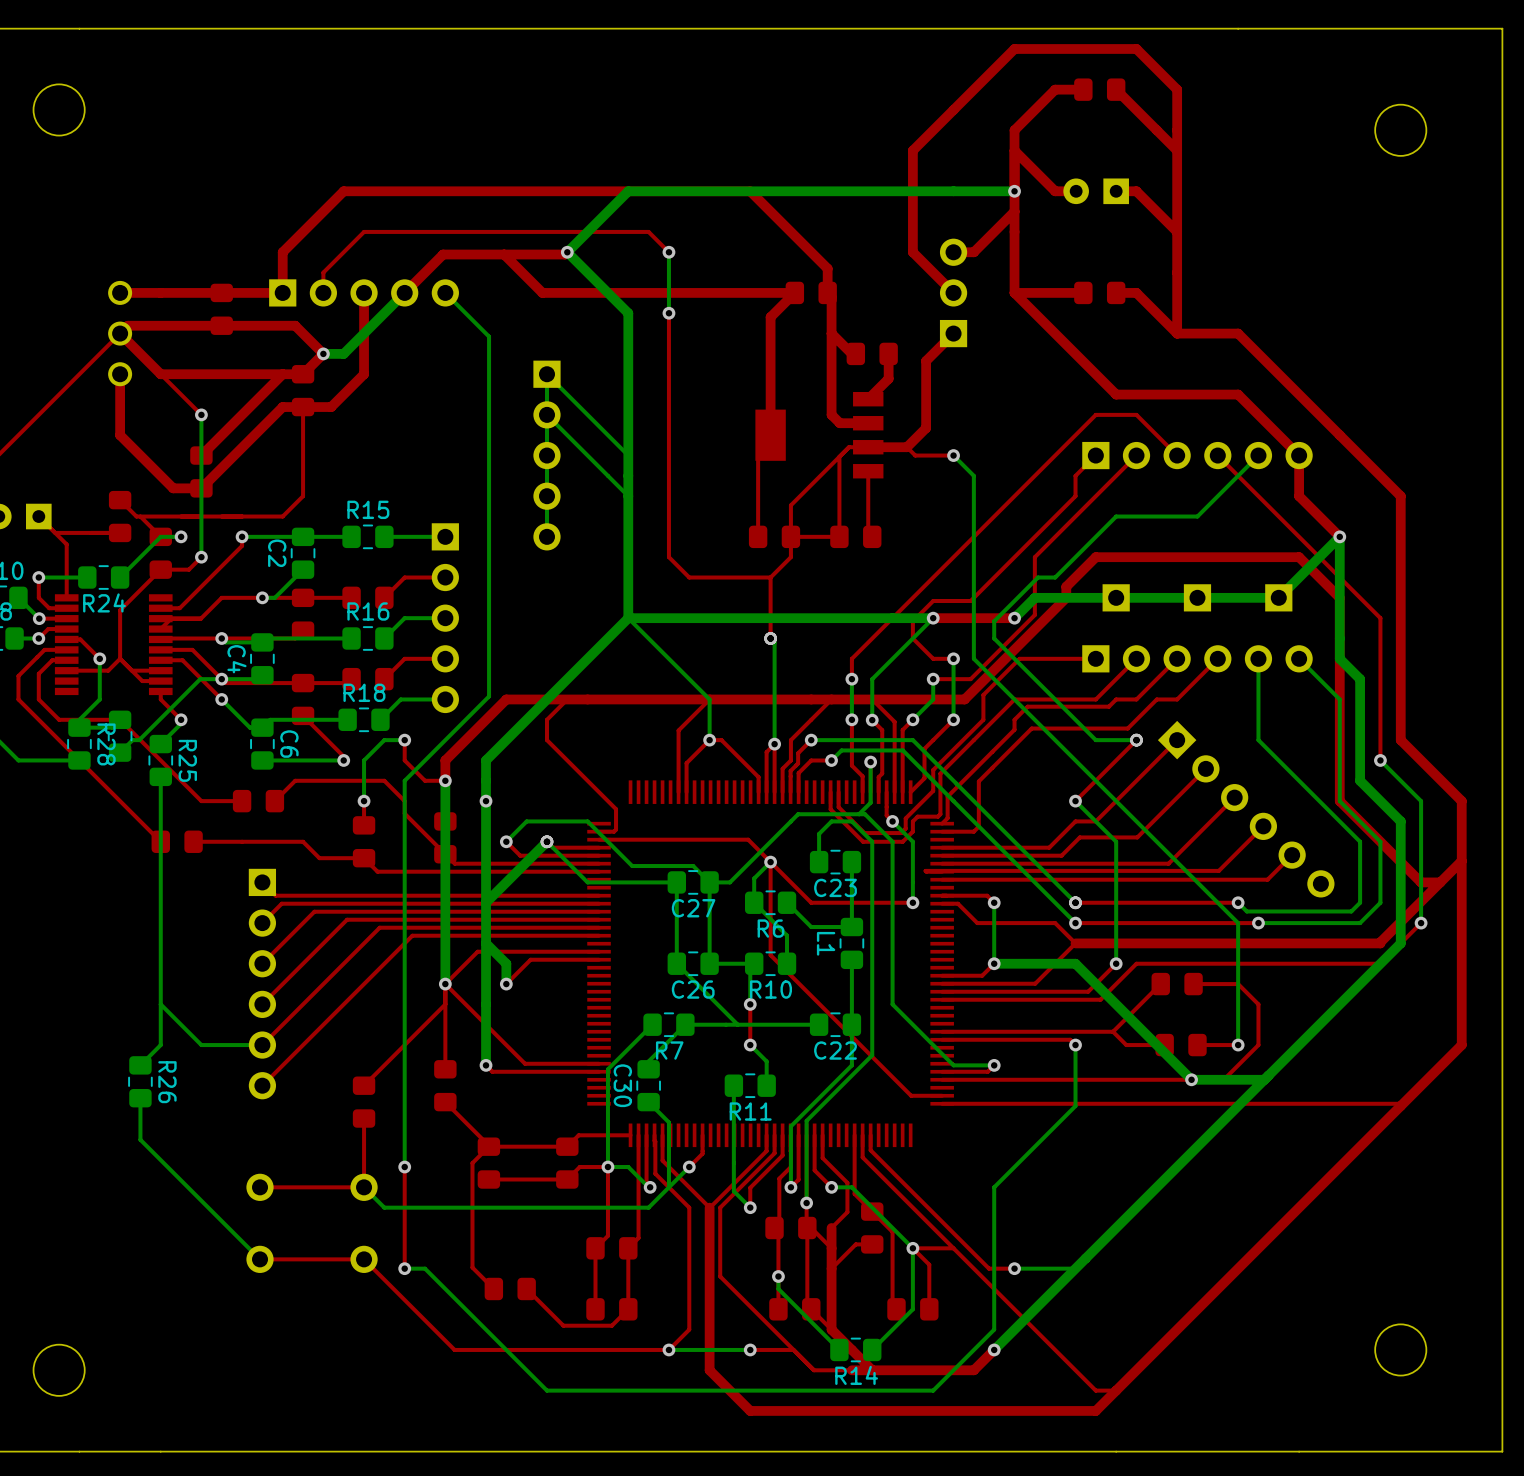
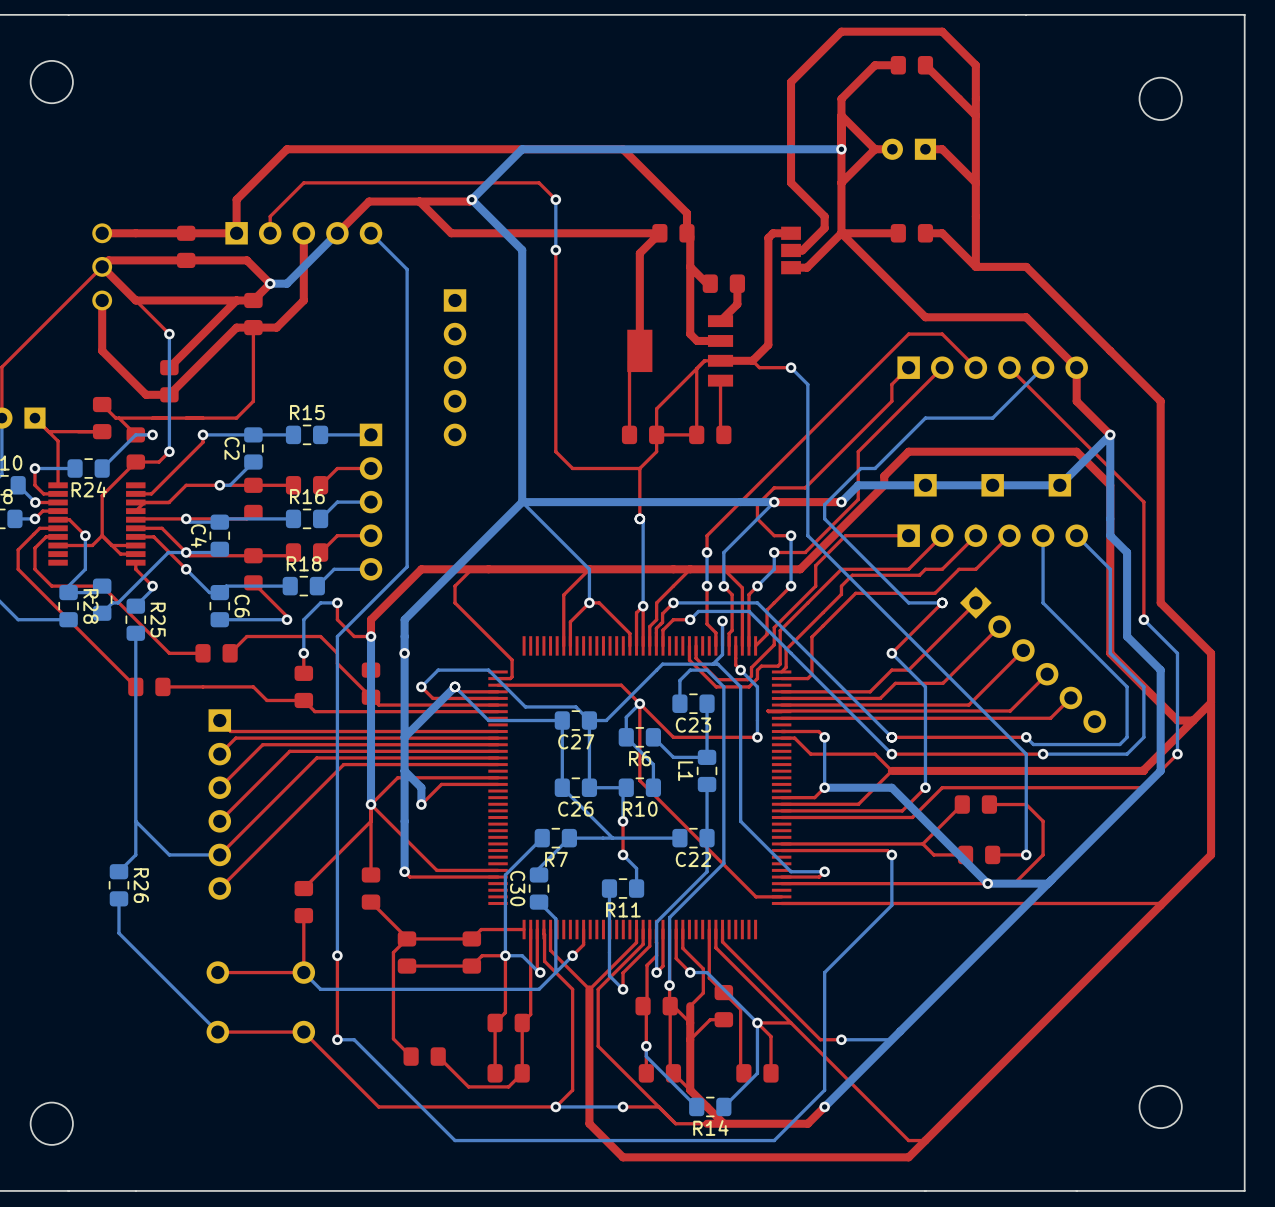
top track: (953, 109) (912, 150) (912, 252) (953, 292) -> (791, 82) (791, 182) (824, 216) (824, 228) (802, 250) (791, 250)
top track: none -> (875, 149) (841, 182)
top track: (1014, 211) (973, 252) (953, 252) -> none
part: (953, 292) -> none
top track: none -> (841, 233) (807, 267) (791, 267)
part: none -> (791, 250)
top track: (953, 333) (926, 361) -> (791, 233) (773, 233) (768, 237) (768, 289)
bottom track: (546, 414) (628, 496) -> none
bottom track: (628, 475) (628, 455) (546, 374) (546, 536) -> none

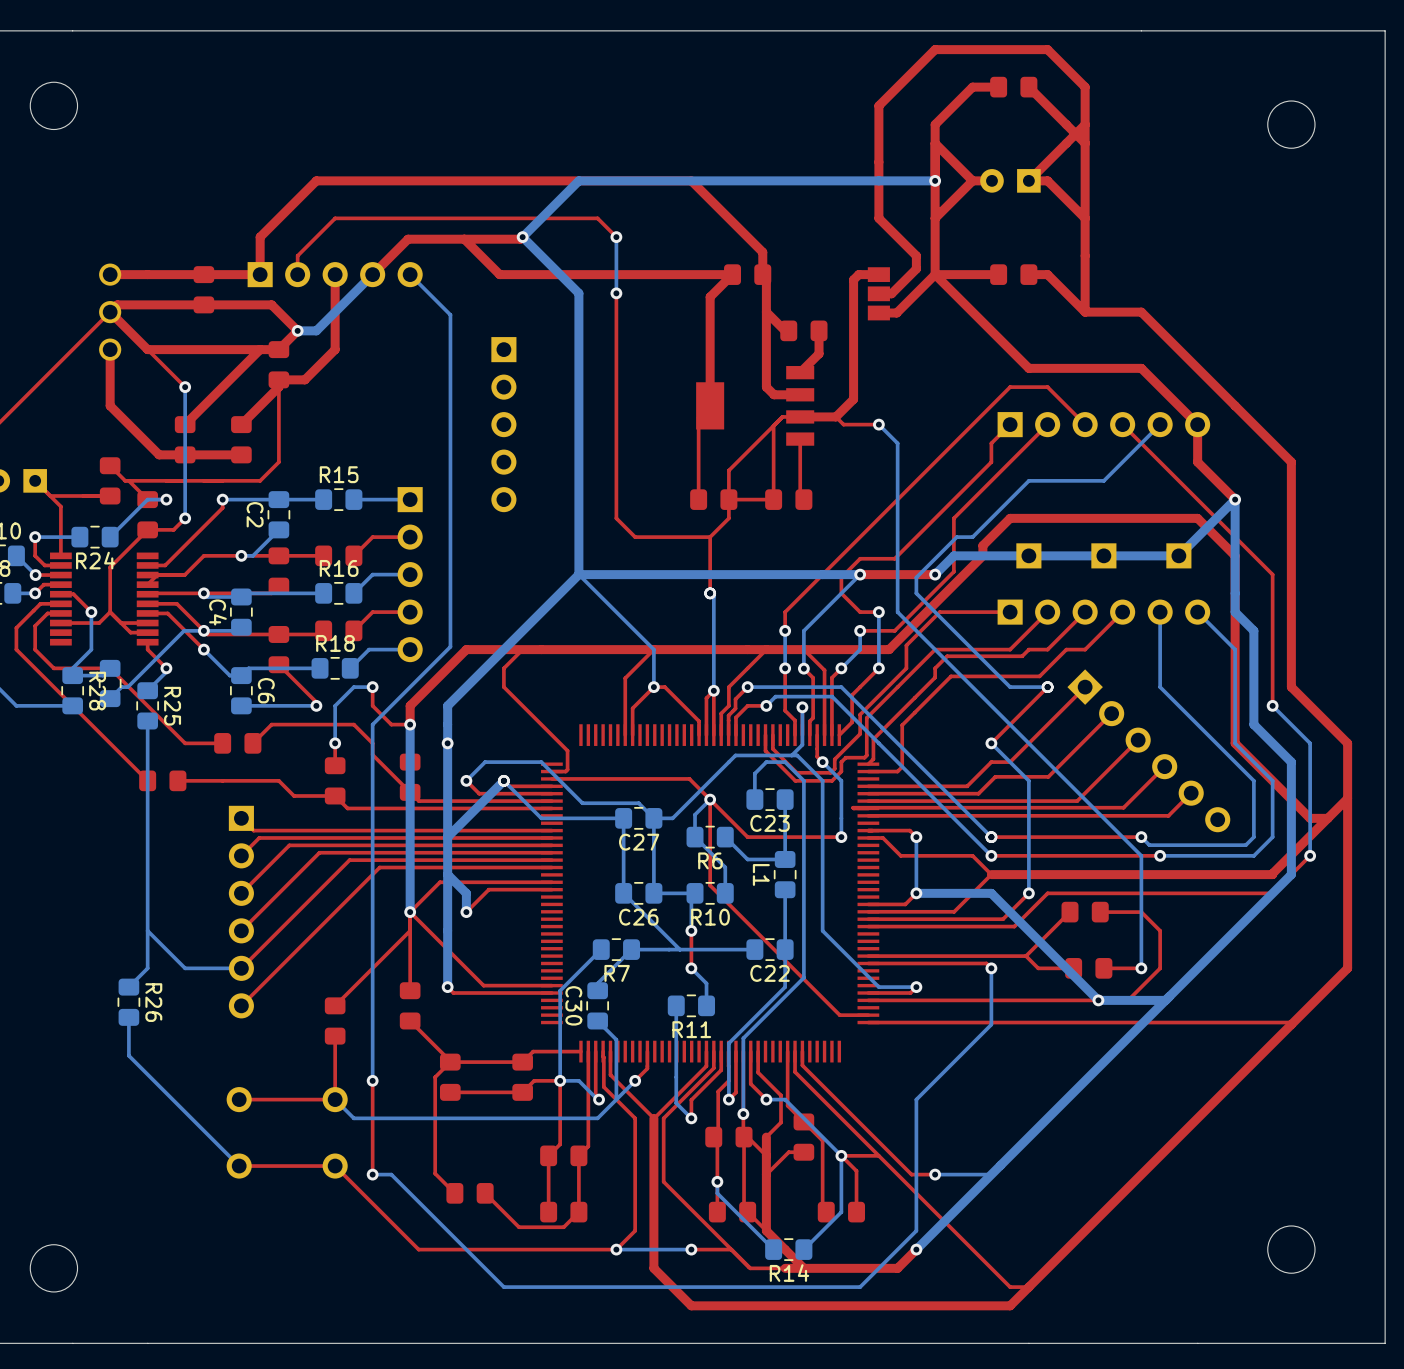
top track: none -> (1085, 124) (1028, 180)
top track: (253, 327) (236, 327) (169, 394) -> (278, 379) (278, 387) (241, 424)
part: none -> (241, 439)
top track: none -> (241, 454) (185, 454)

